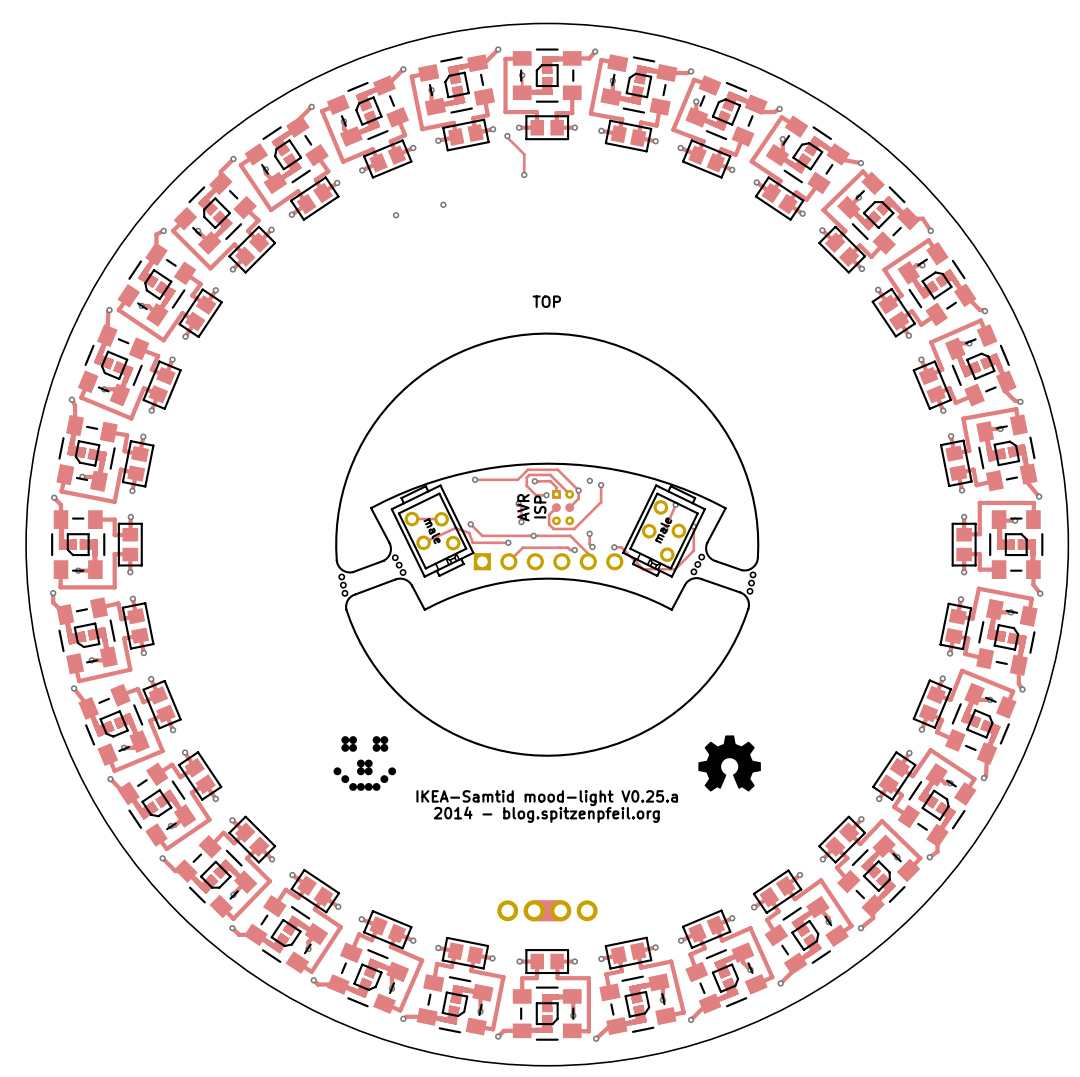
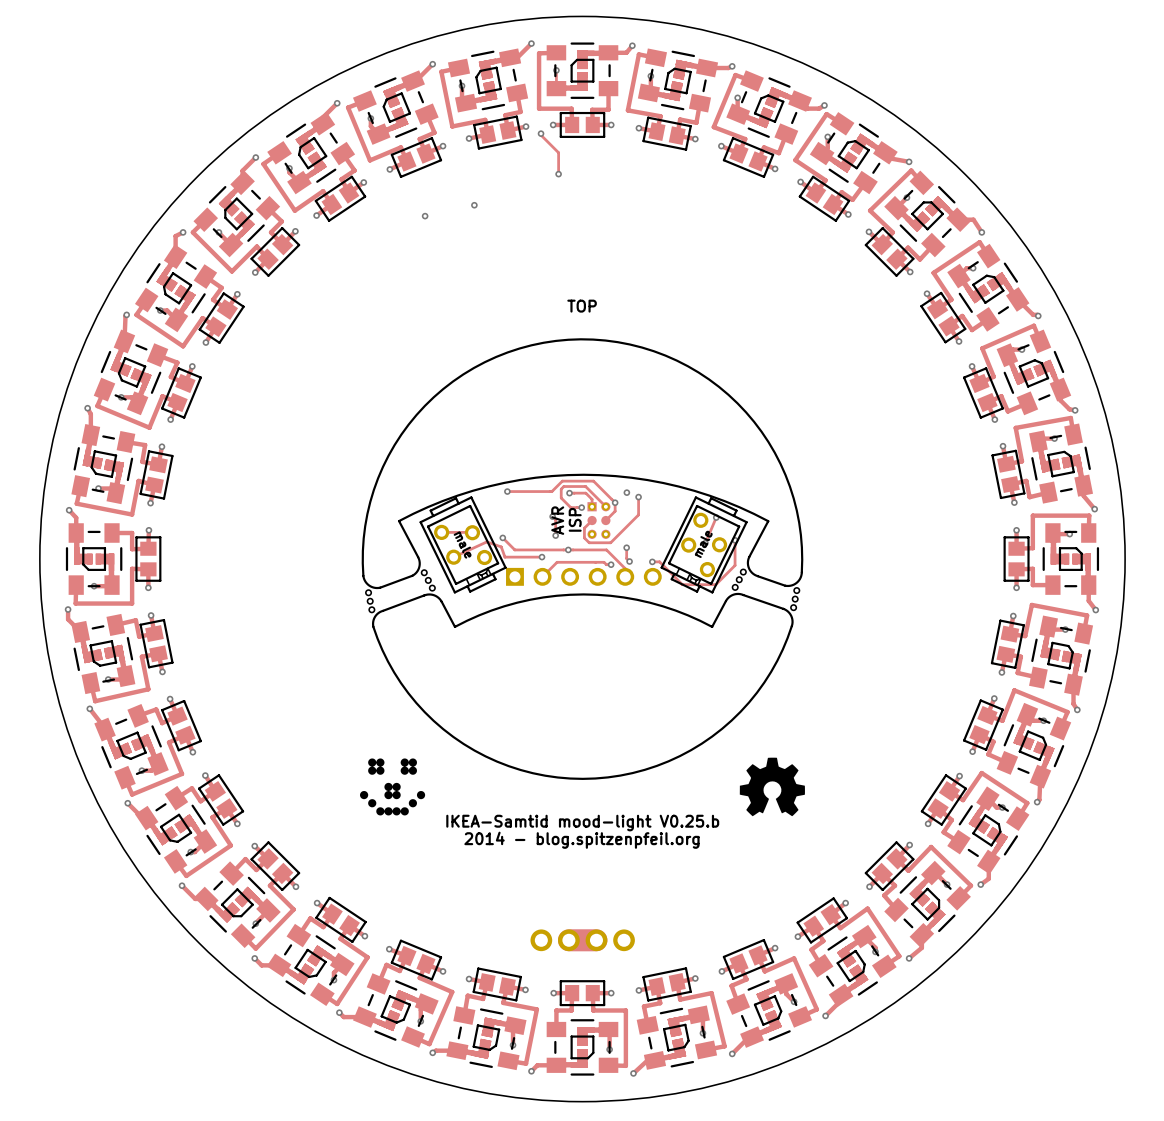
part footprint: [552, 489, 575, 526] -> [587, 502, 611, 539]
text: IKEA-Samtid mood-light V0.25.a (547, 798) -> IKEA-Samtid mood-light V0.25.b (582, 823)

